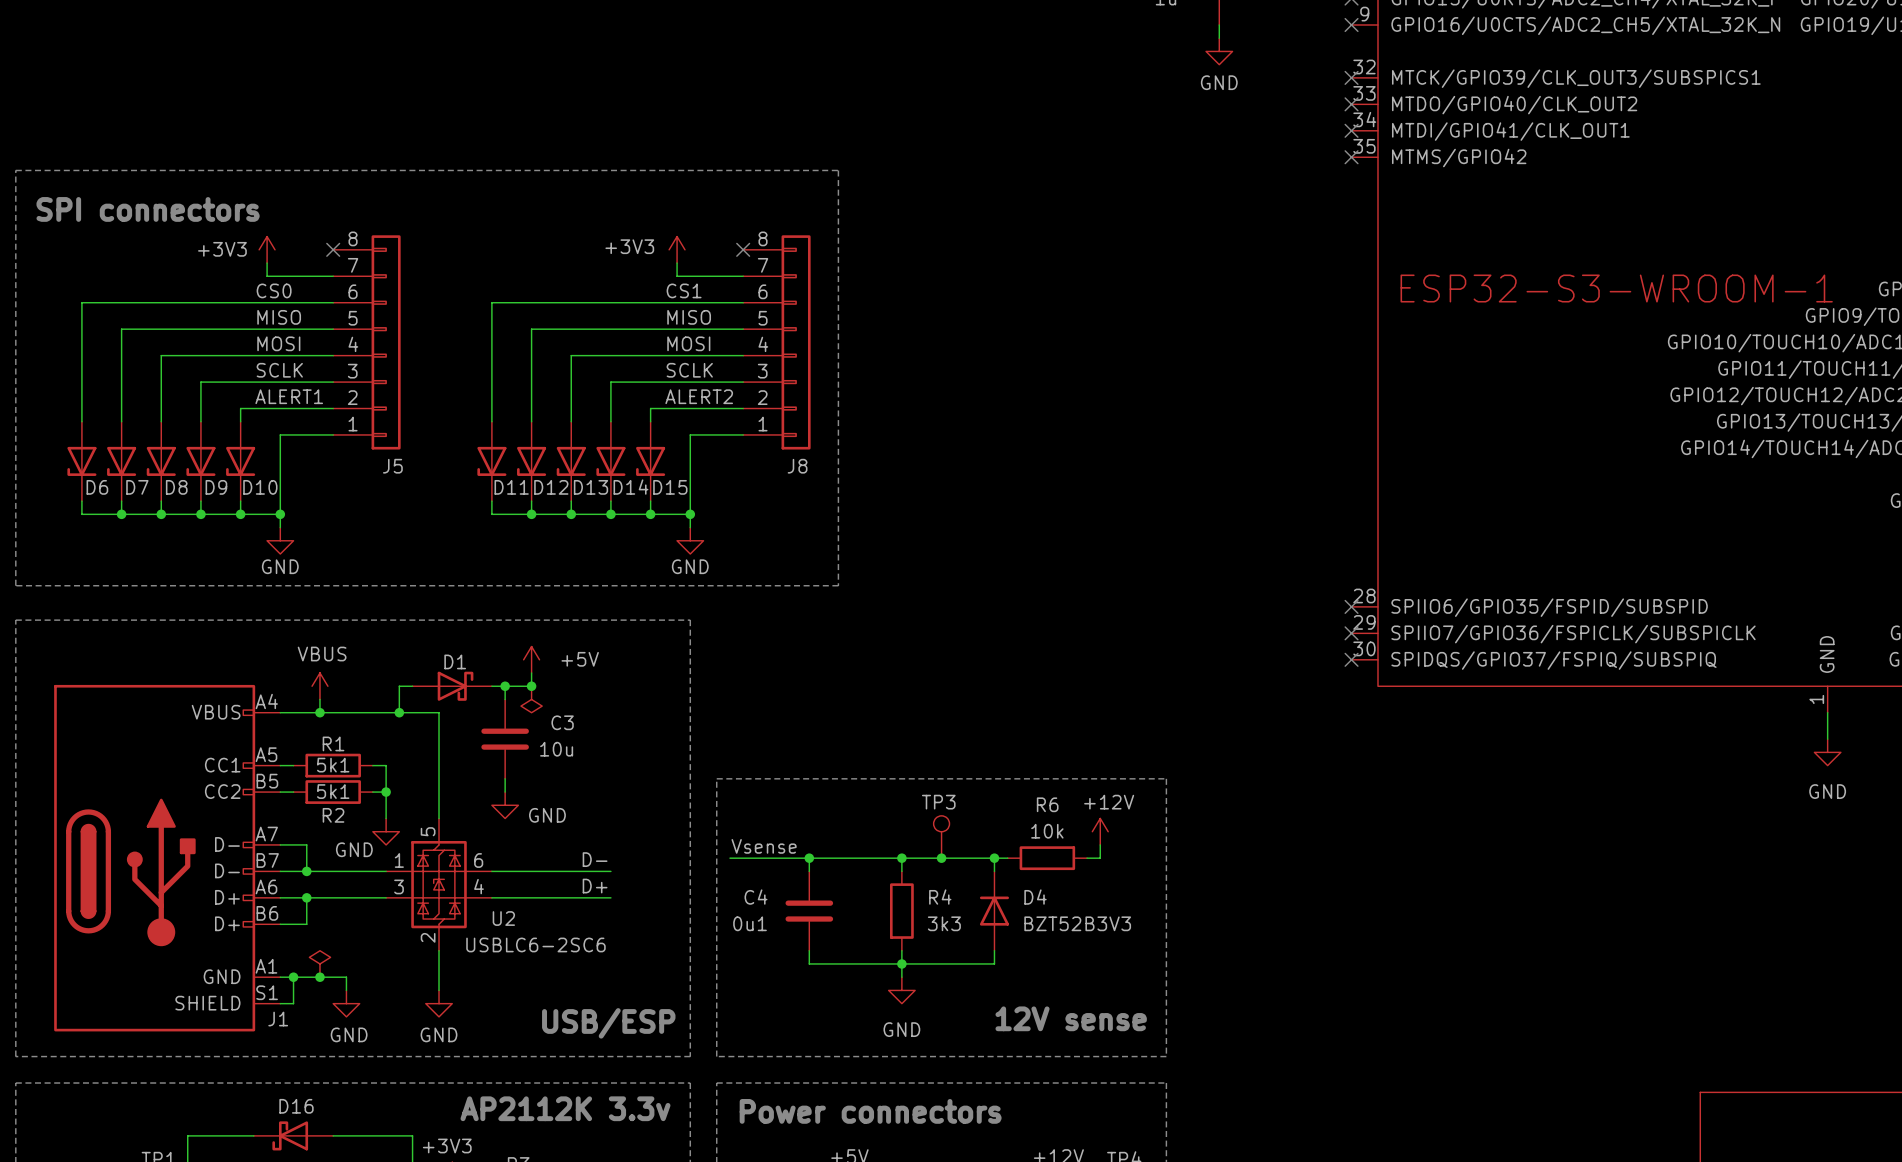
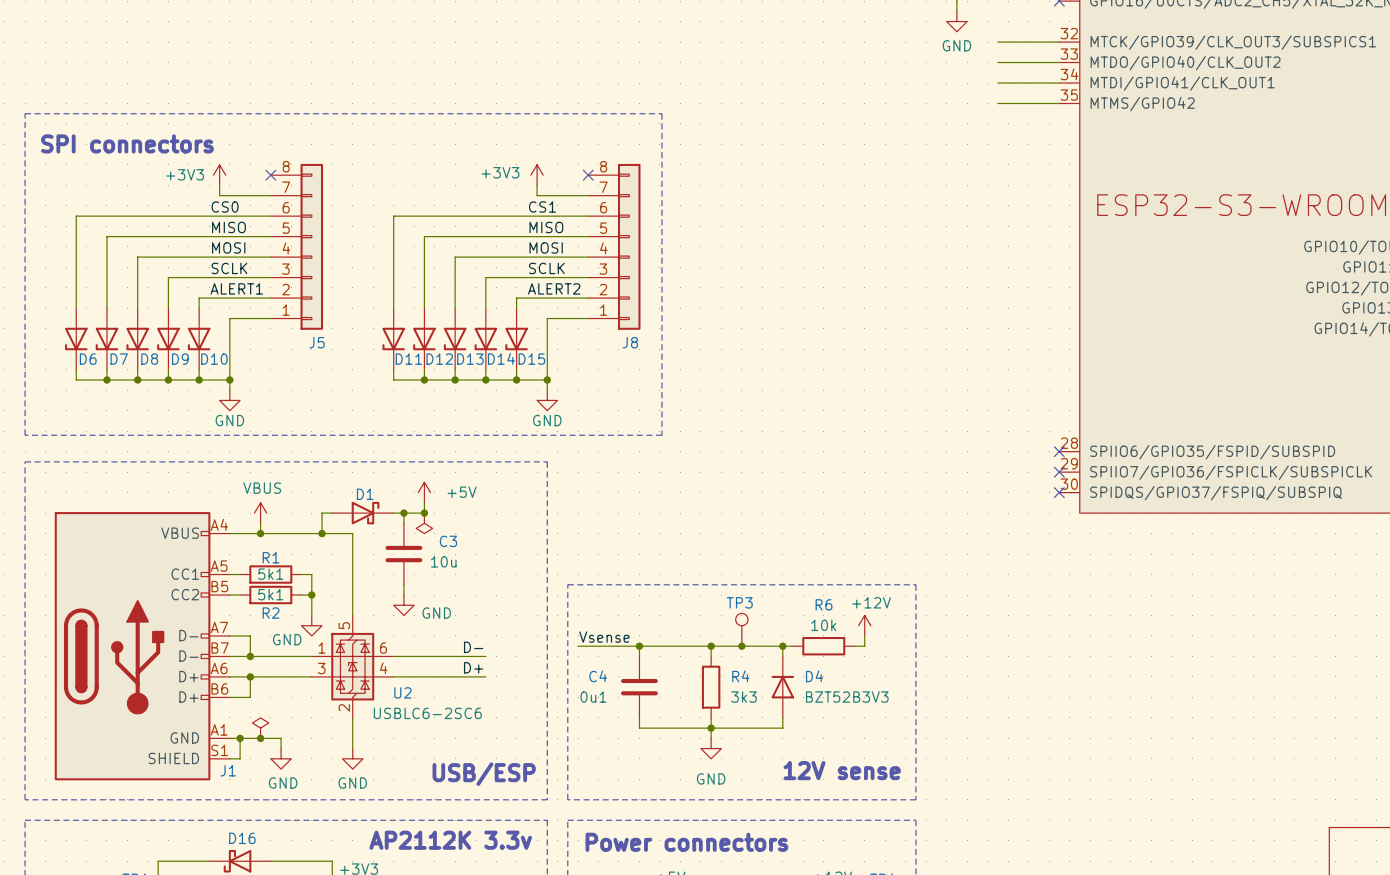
wire: none -> (997, 42) (1059, 42)
no-connect mark: (1351, 77) -> none
wire: none -> (997, 62) (1059, 62)
no-connect mark: (1351, 104) -> none
wire: none -> (997, 83) (1059, 83)
no-connect mark: (1351, 130) -> none
wire: none -> (997, 103) (1059, 103)
no-connect mark: (1351, 157) -> none

